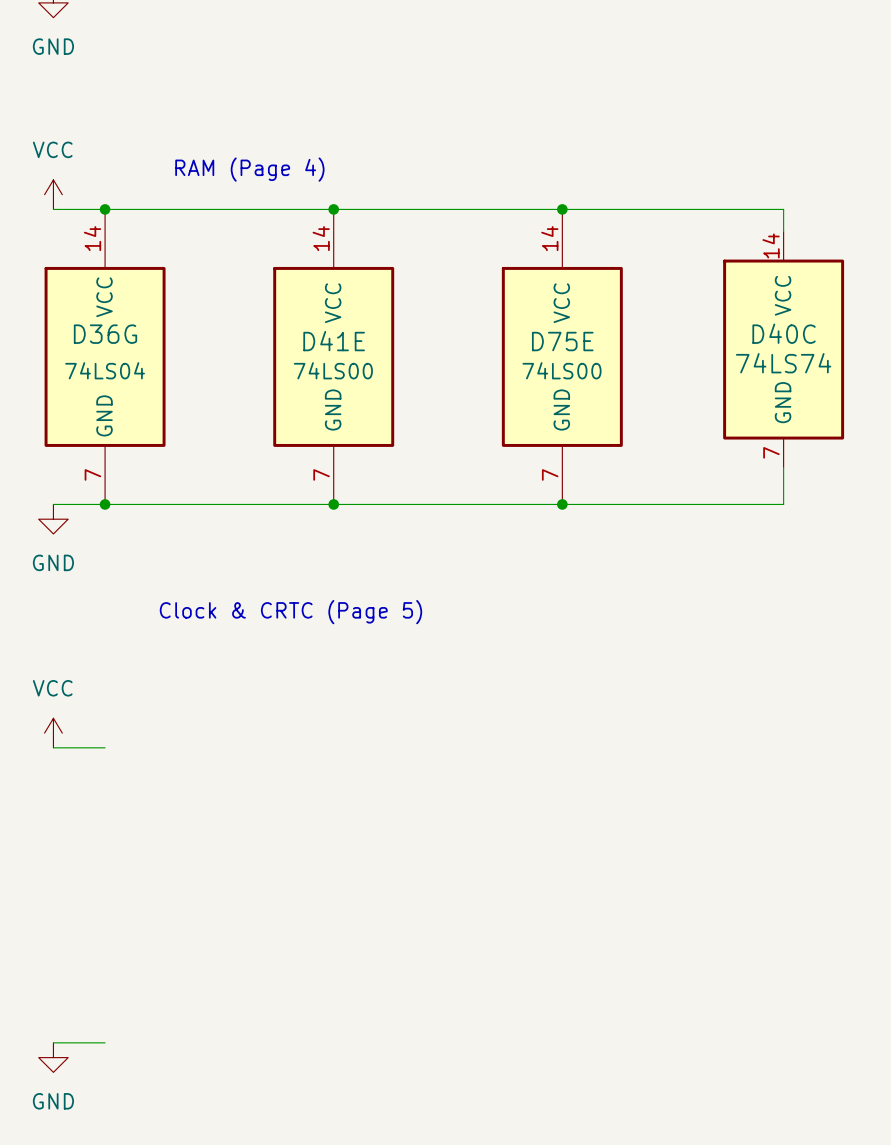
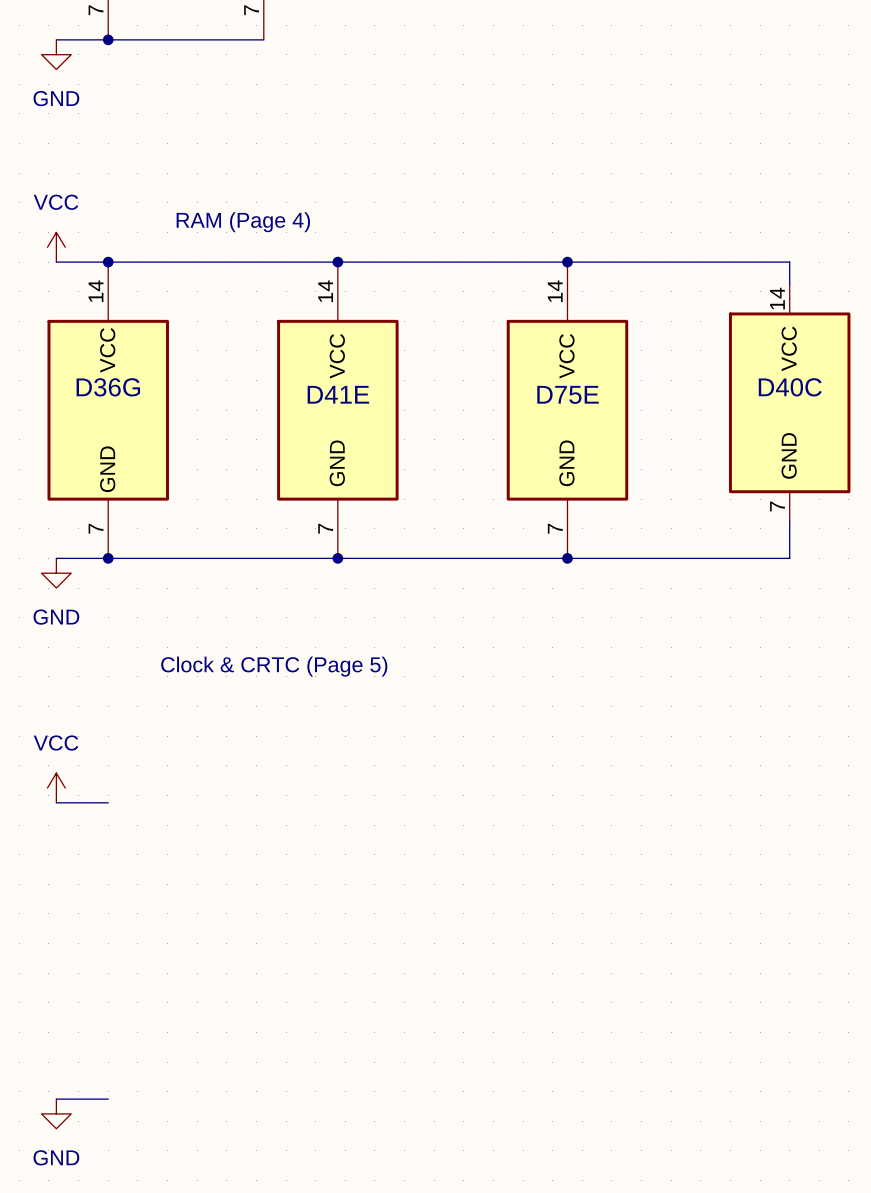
D40C value: 74LS74 (783, 363) -> none
D36G value: 74LS04 (105, 370) -> none
D41E value: 74LS00 (333, 370) -> none
D75E value: 74LS00 (561, 370) -> none

